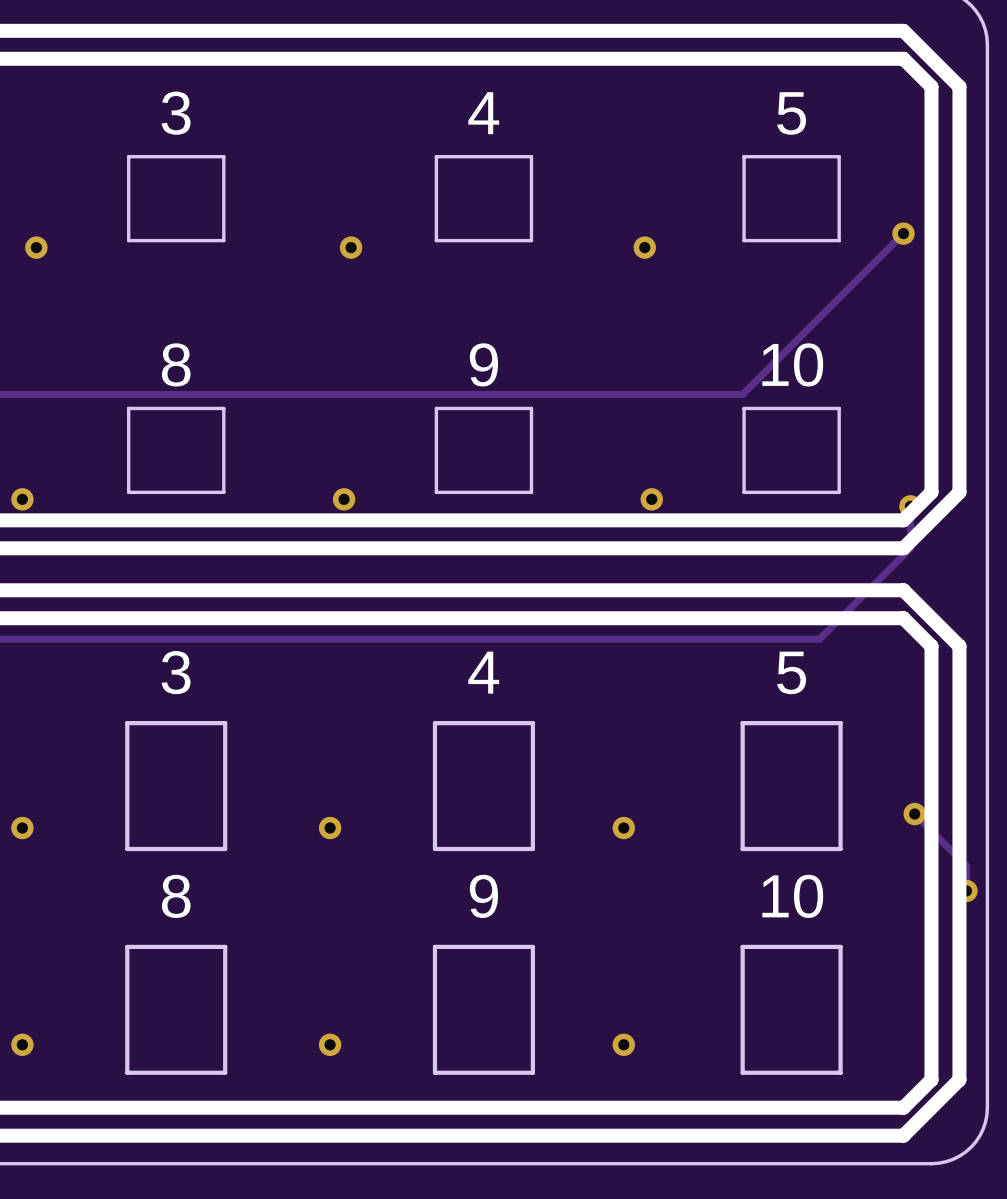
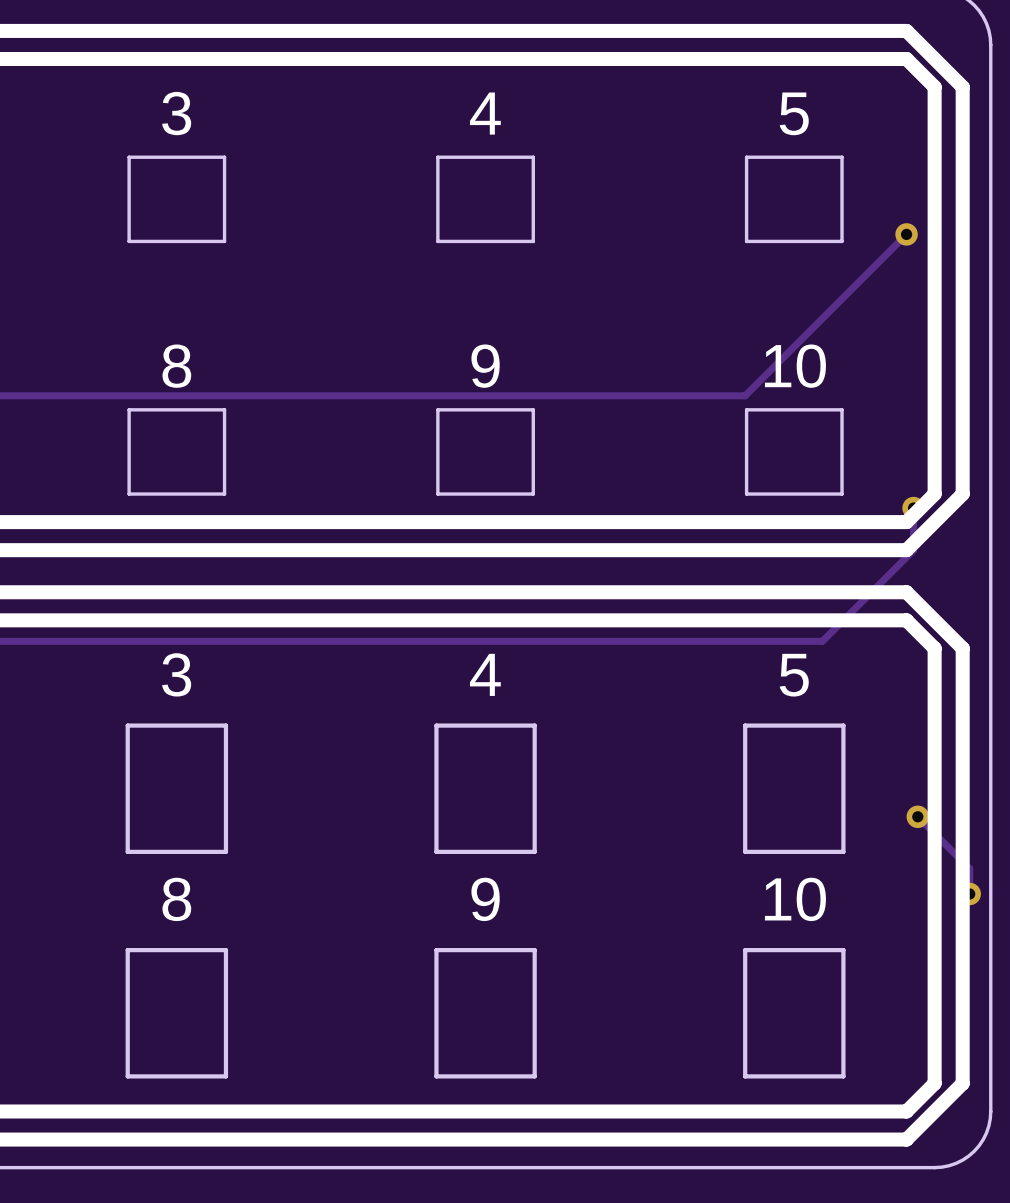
via: (36, 247) -> none
via: (351, 247) -> none
via: (644, 247) -> none
via: (22, 499) -> none
via: (344, 499) -> none
via: (651, 499) -> none
via: (22, 828) -> none
via: (330, 828) -> none
via: (623, 828) -> none
via: (22, 1044) -> none
via: (330, 1044) -> none
via: (623, 1044) -> none

